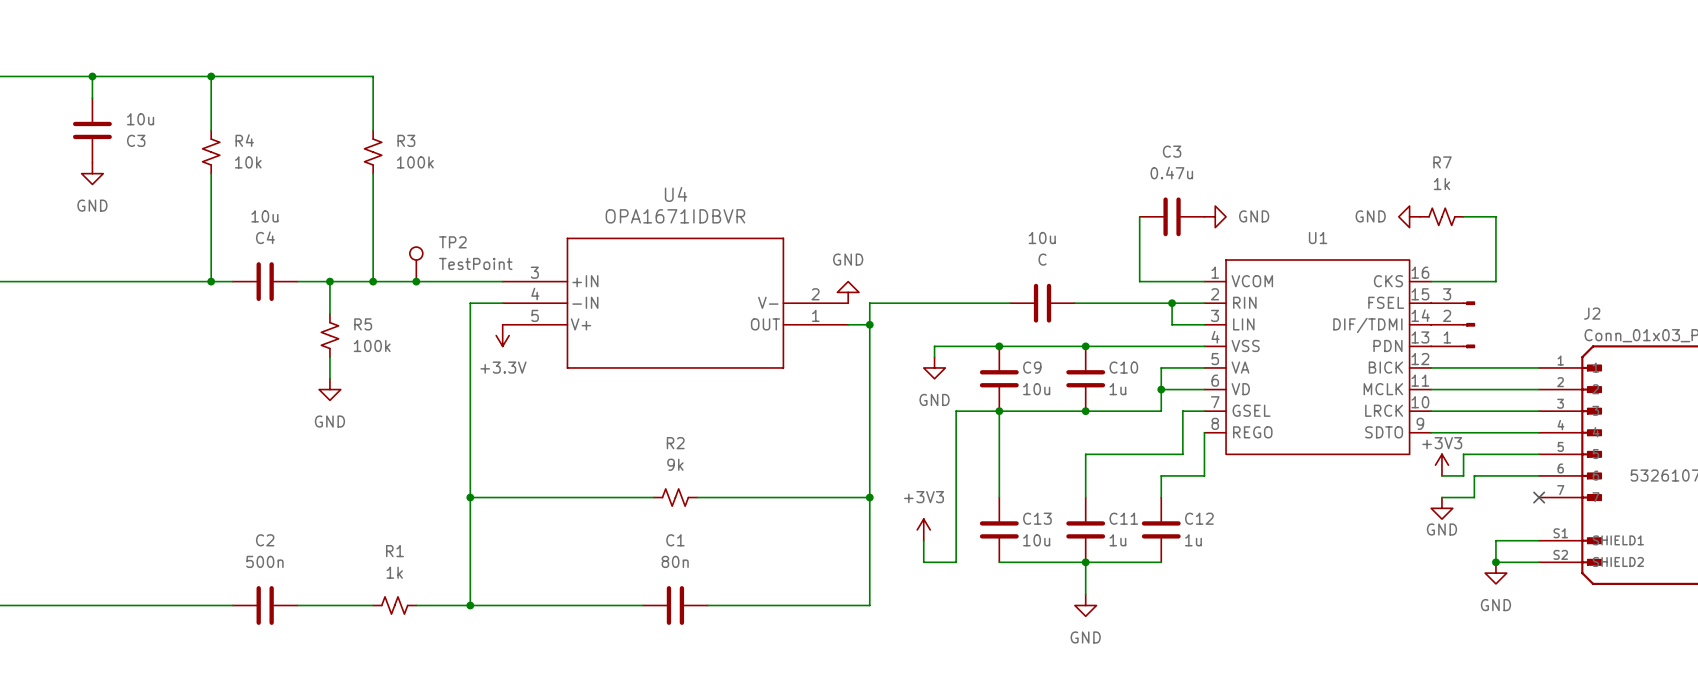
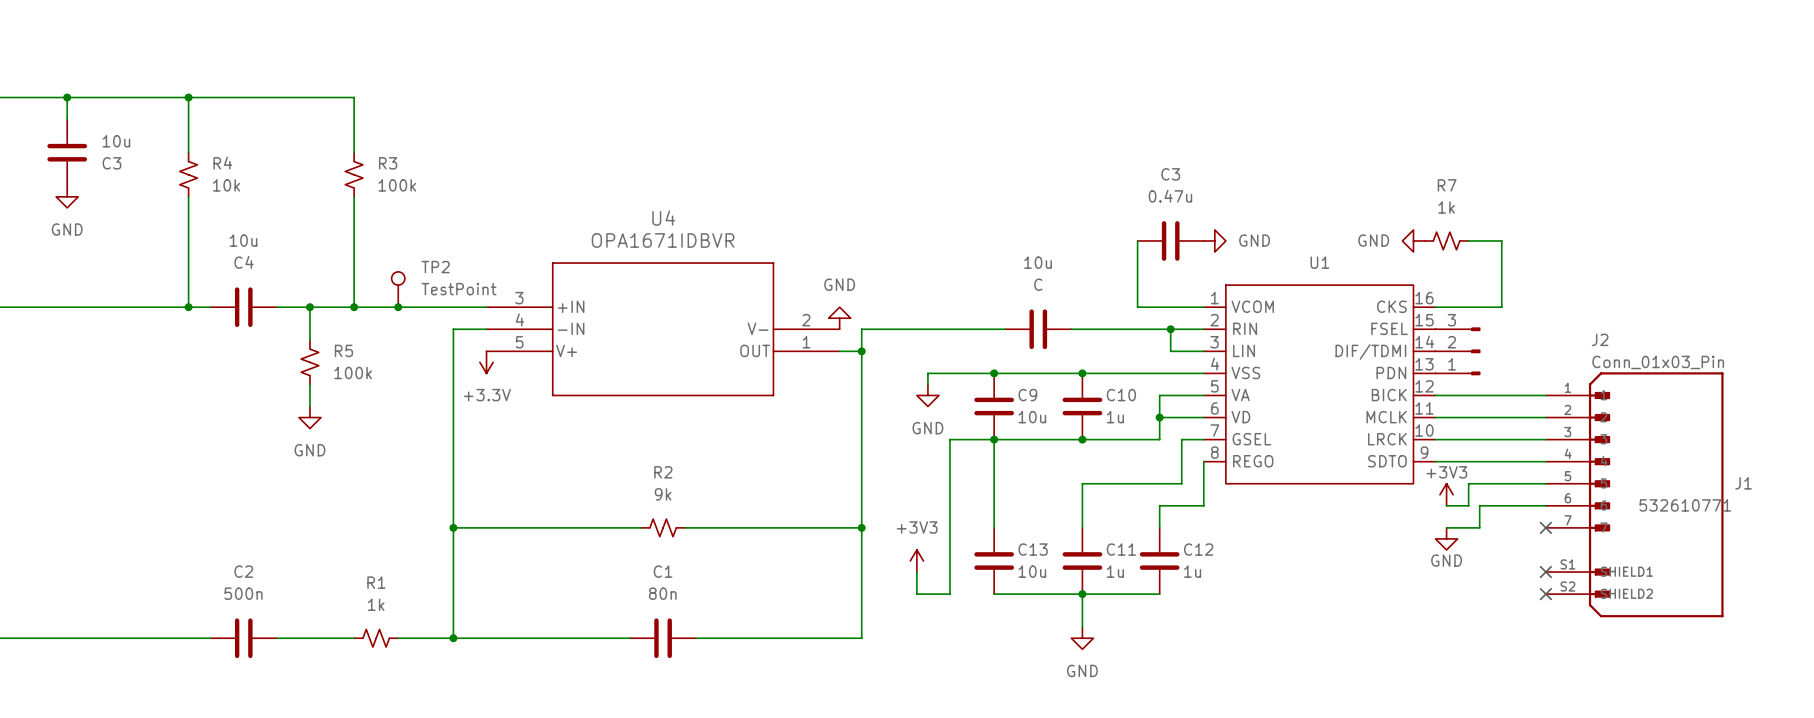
wire: (1539, 540) (1495, 540) (1495, 562) (1539, 562) -> none
no-connect mark: none -> (1545, 572)
junction: (1495, 562) -> none
no-connect mark: none -> (1545, 594)
power symbol: GND (1495, 573) -> none

